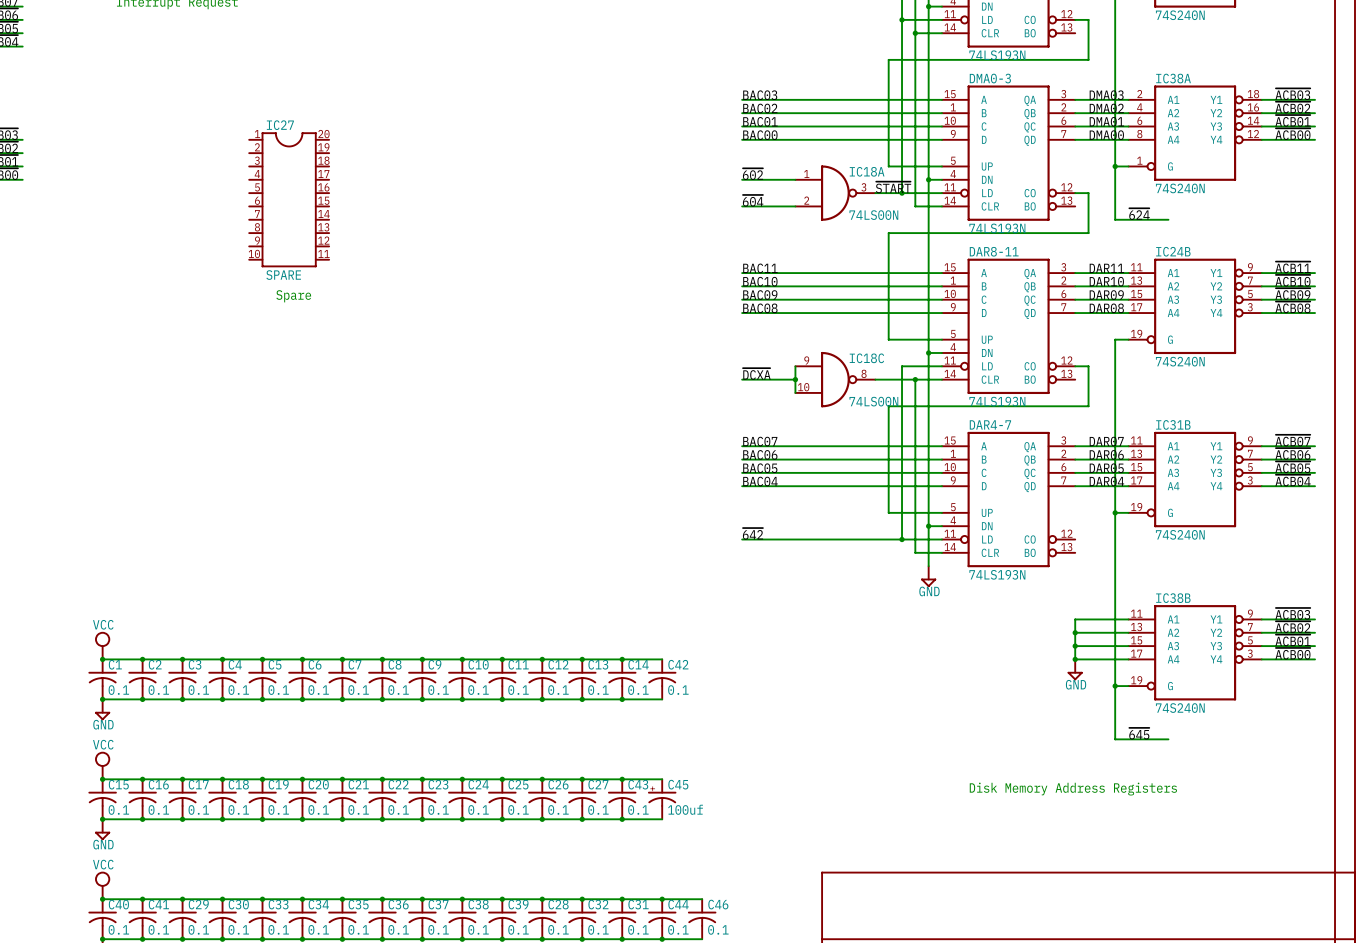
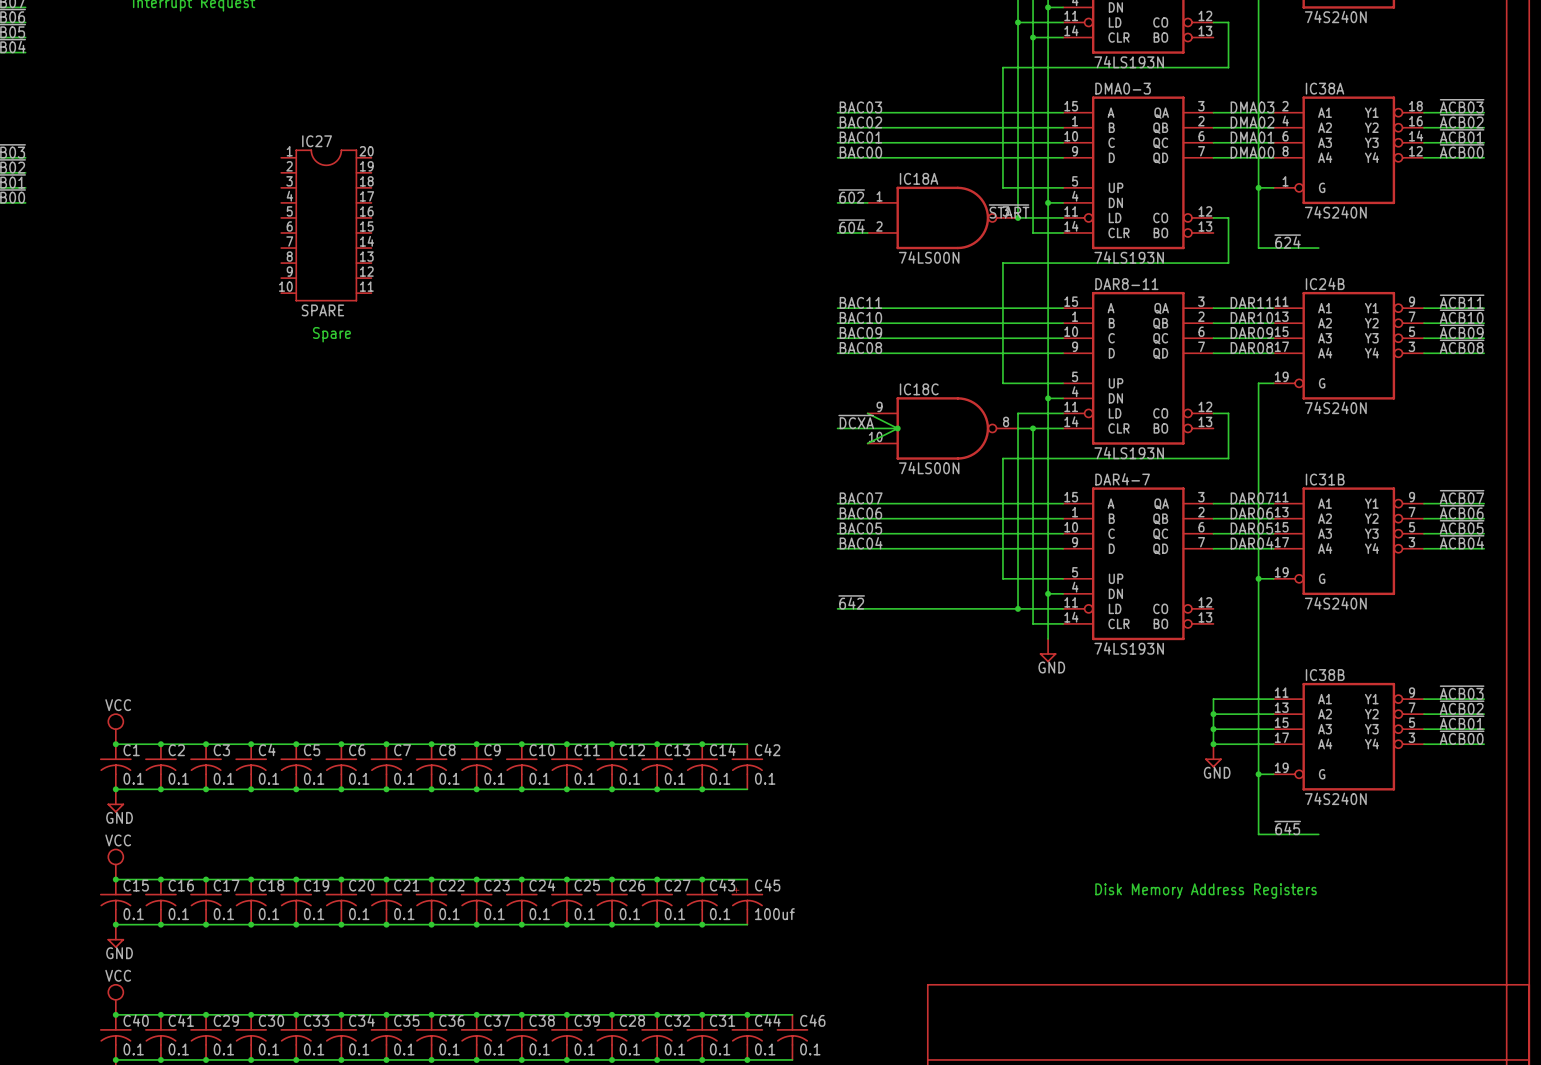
IC18A symbol: [795, 165, 876, 221] -> [867, 186, 1019, 250]
IC18A name position: IC18A (867, 171) -> IC18A (919, 178)
IC18A value position: 74LS00N (873, 215) -> 74LS00N (929, 257)
IC18C symbol: [795, 351, 876, 408] -> [867, 397, 1019, 460]
IC18C name position: IC18C (866, 358) -> IC18C (919, 389)
wire: none -> (867, 413) (897, 428) (867, 443)
IC18C value position: 74LS00N (873, 401) -> 74LS00N (929, 468)

